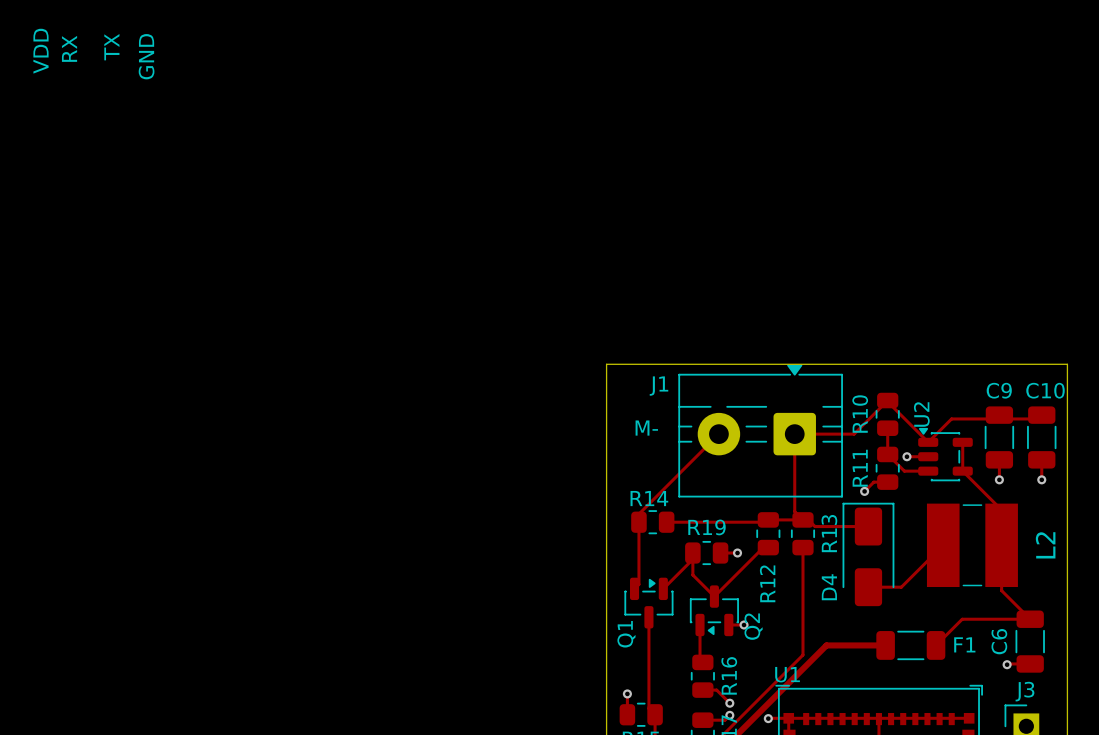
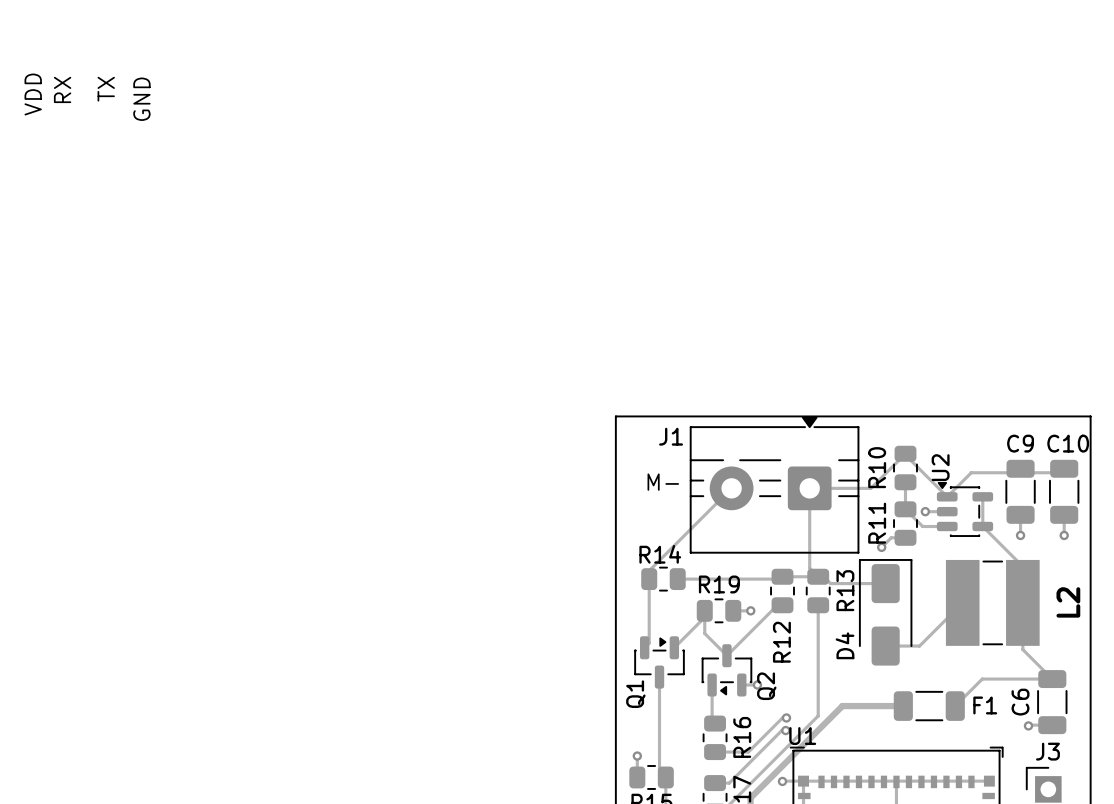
via: none -> (786, 717)
via: none -> (785, 730)
track: (716, 690) (729, 703) -> (729, 752) (748, 752) (782, 717) (786, 717)
via: (729, 703) -> none
track: (729, 715) (724, 720) (716, 720) -> (785, 730) (781, 730) (729, 783)
via: (729, 715) -> none

